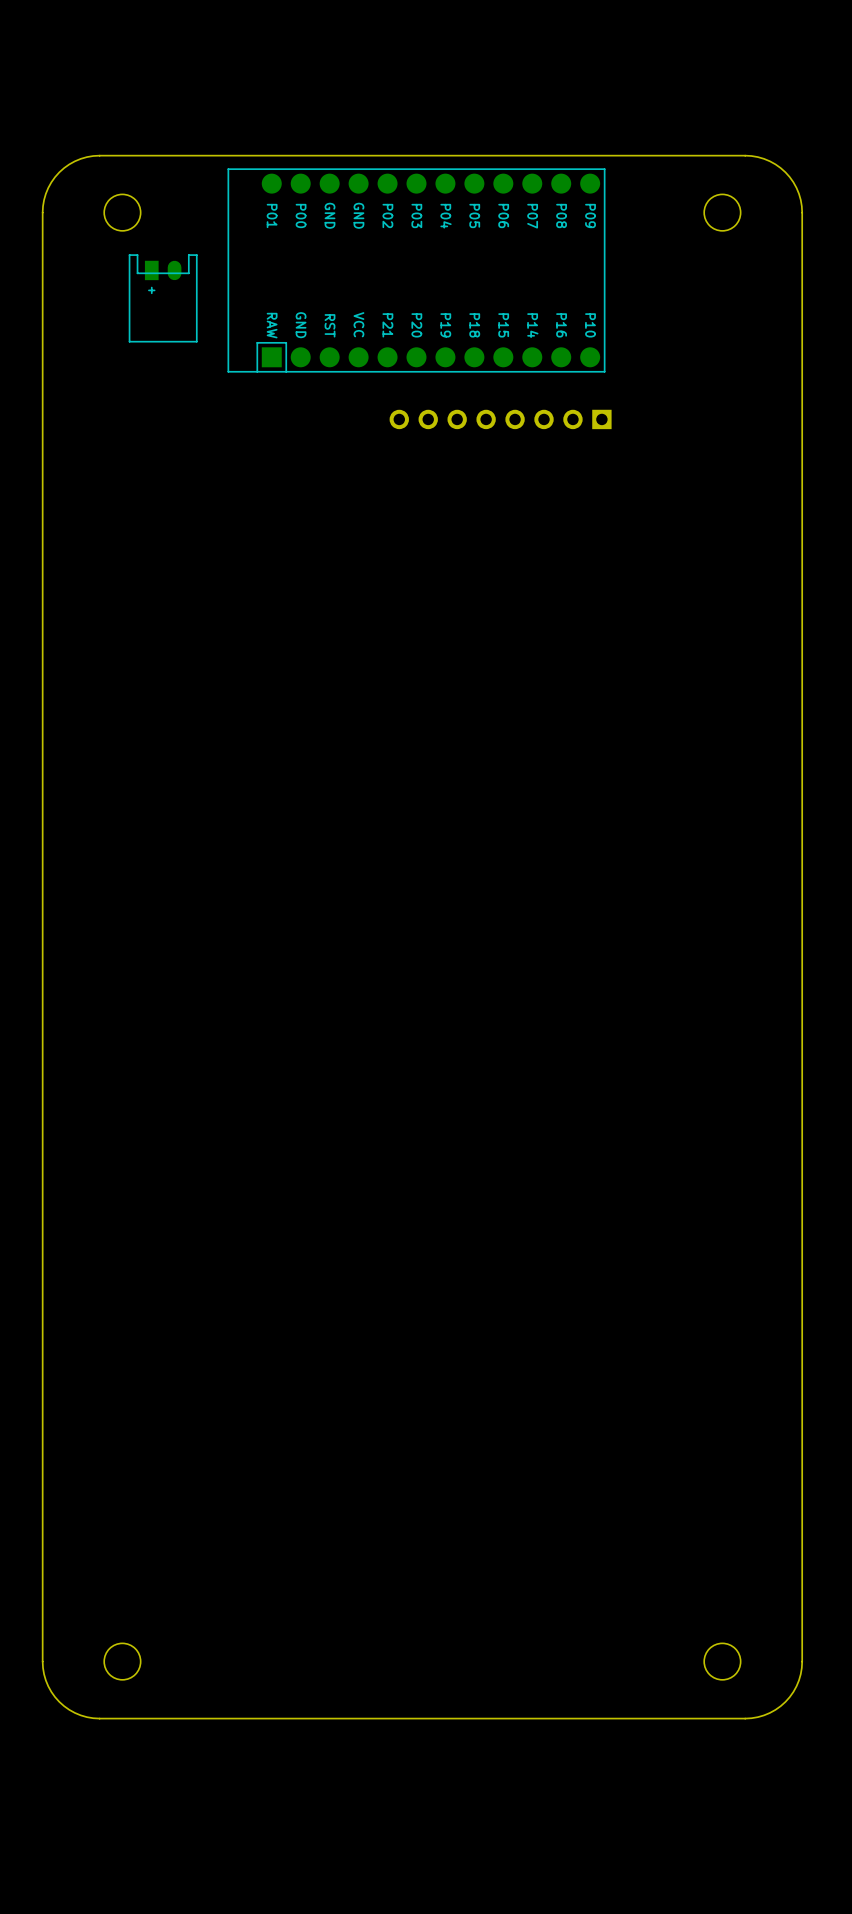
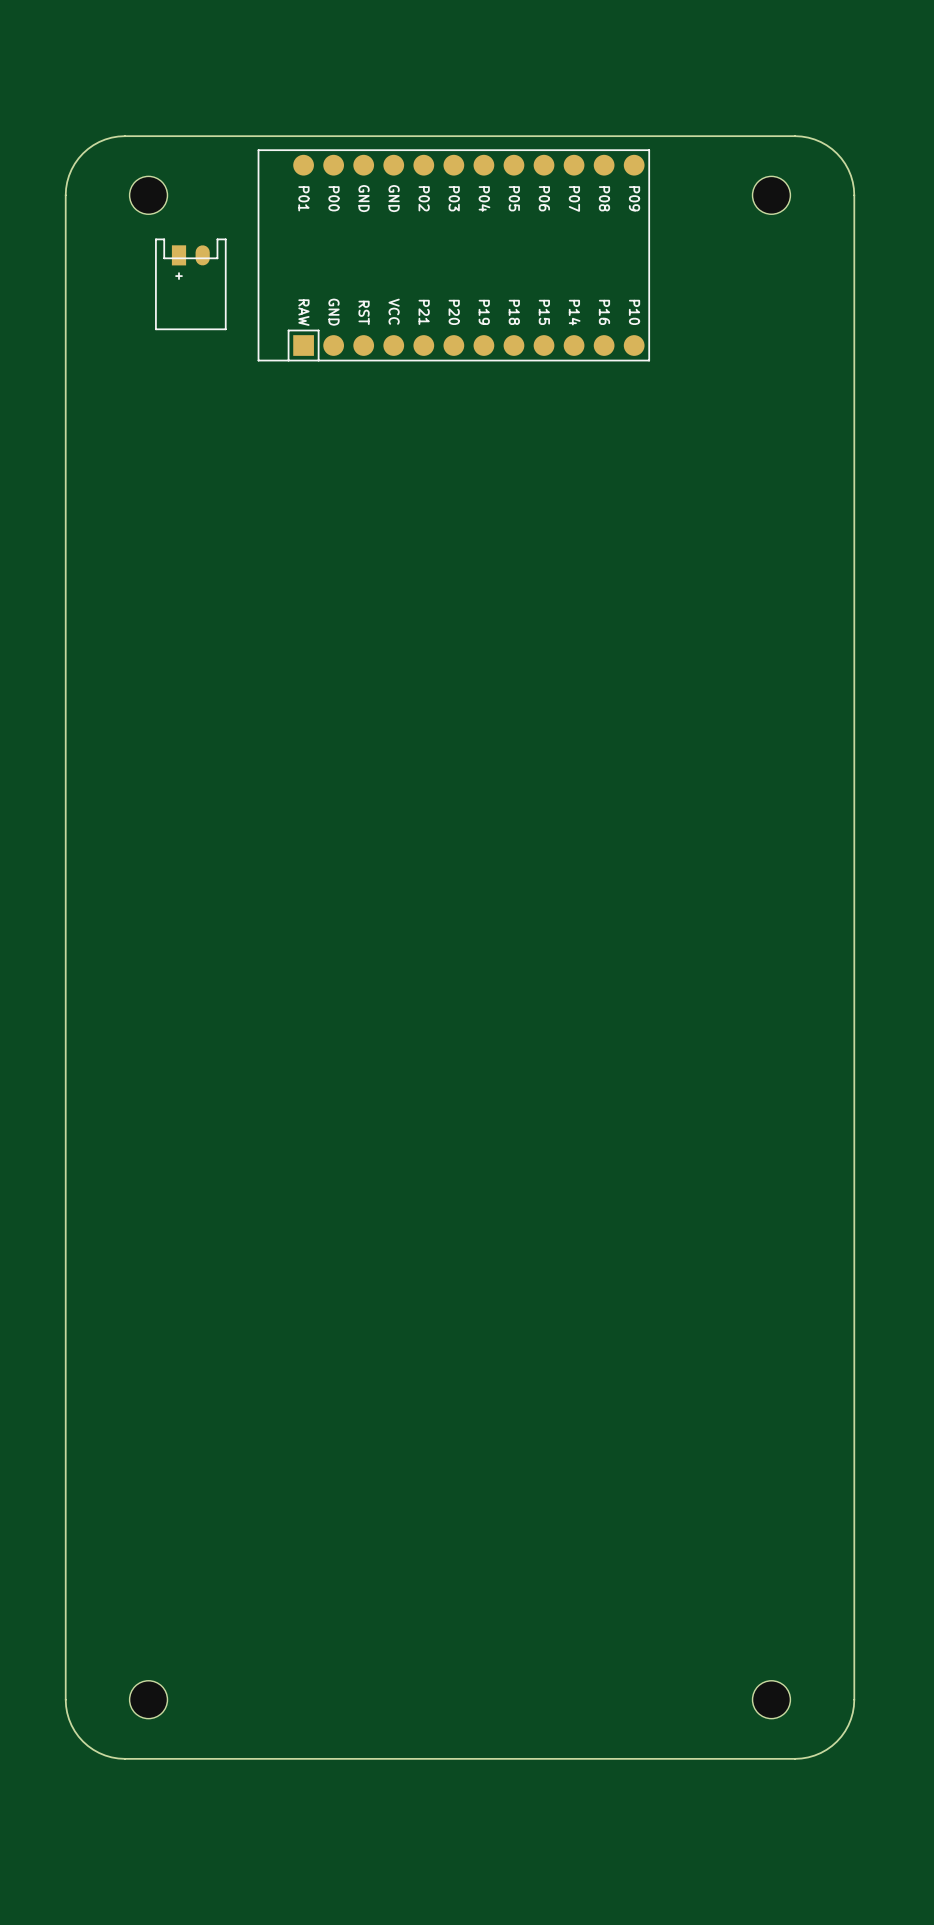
part: (500, 419) -> none

